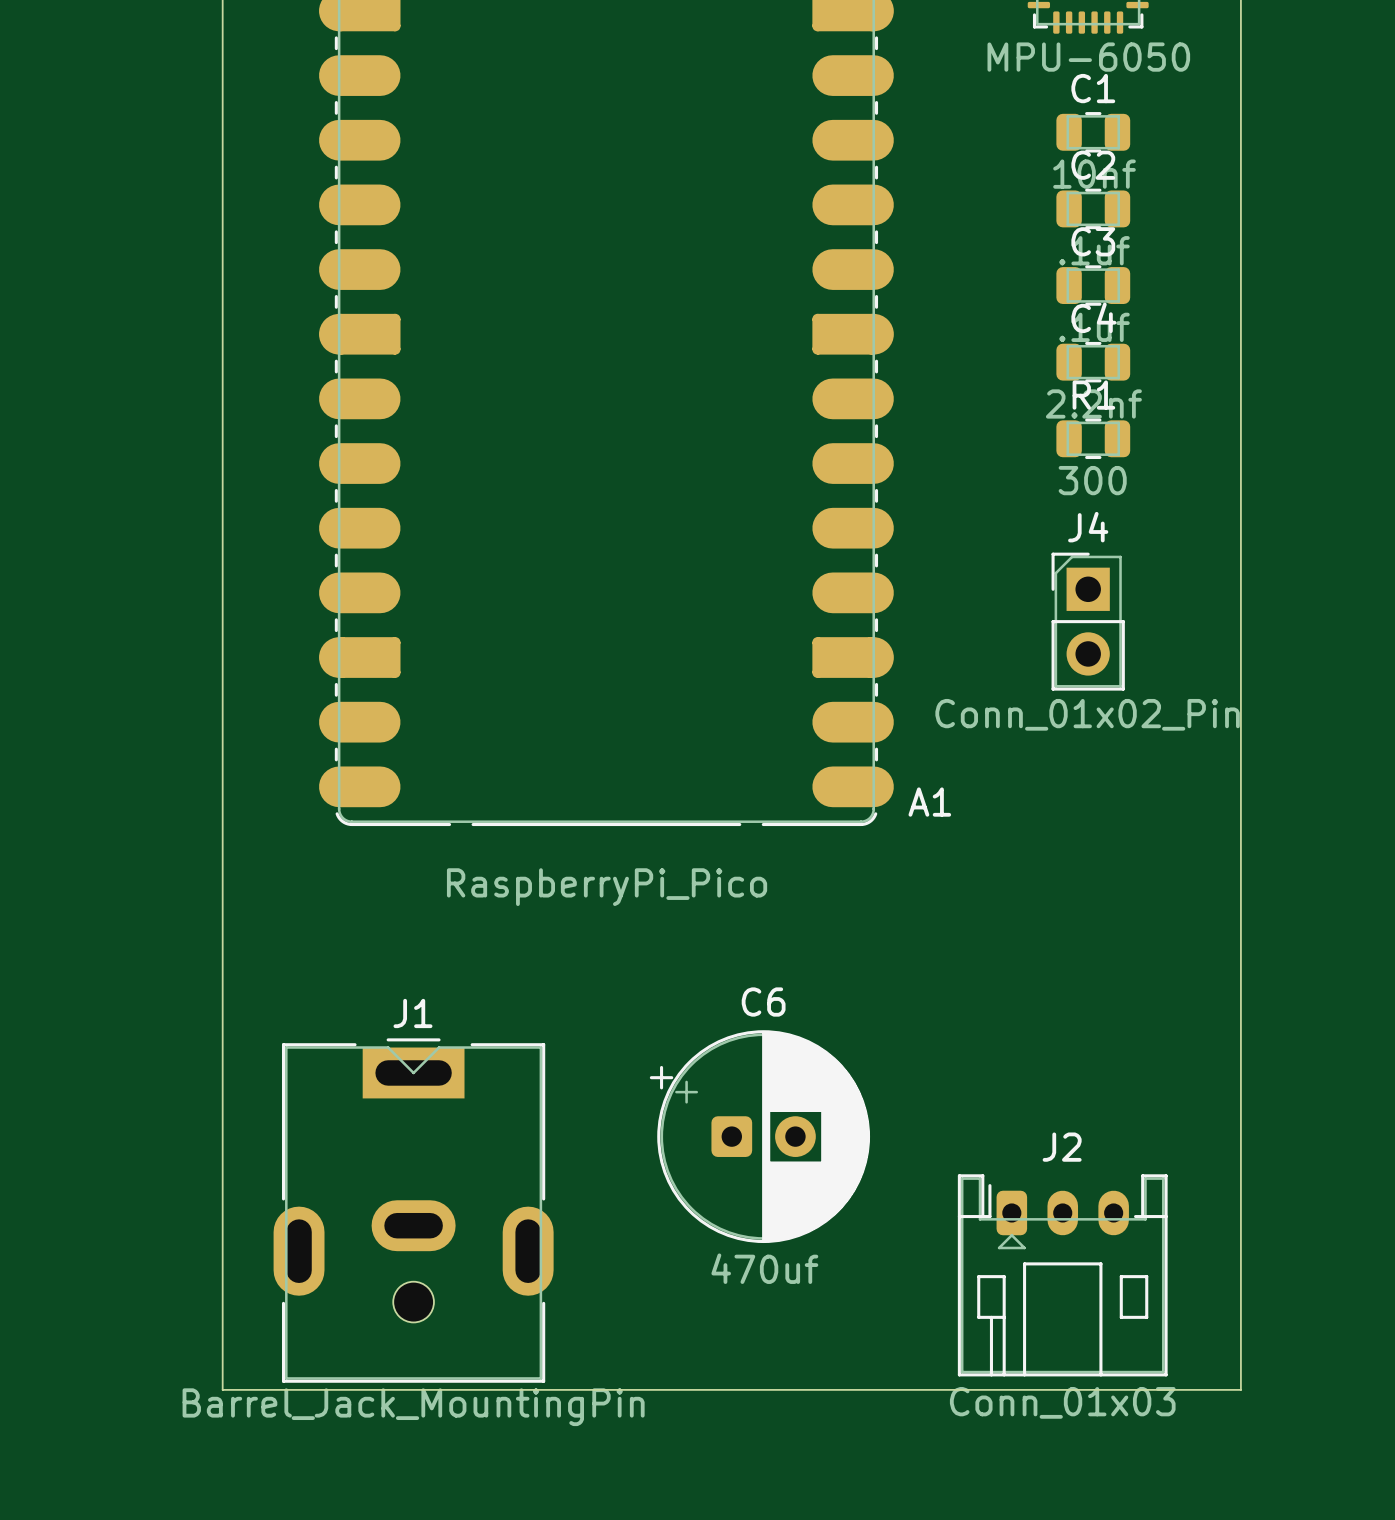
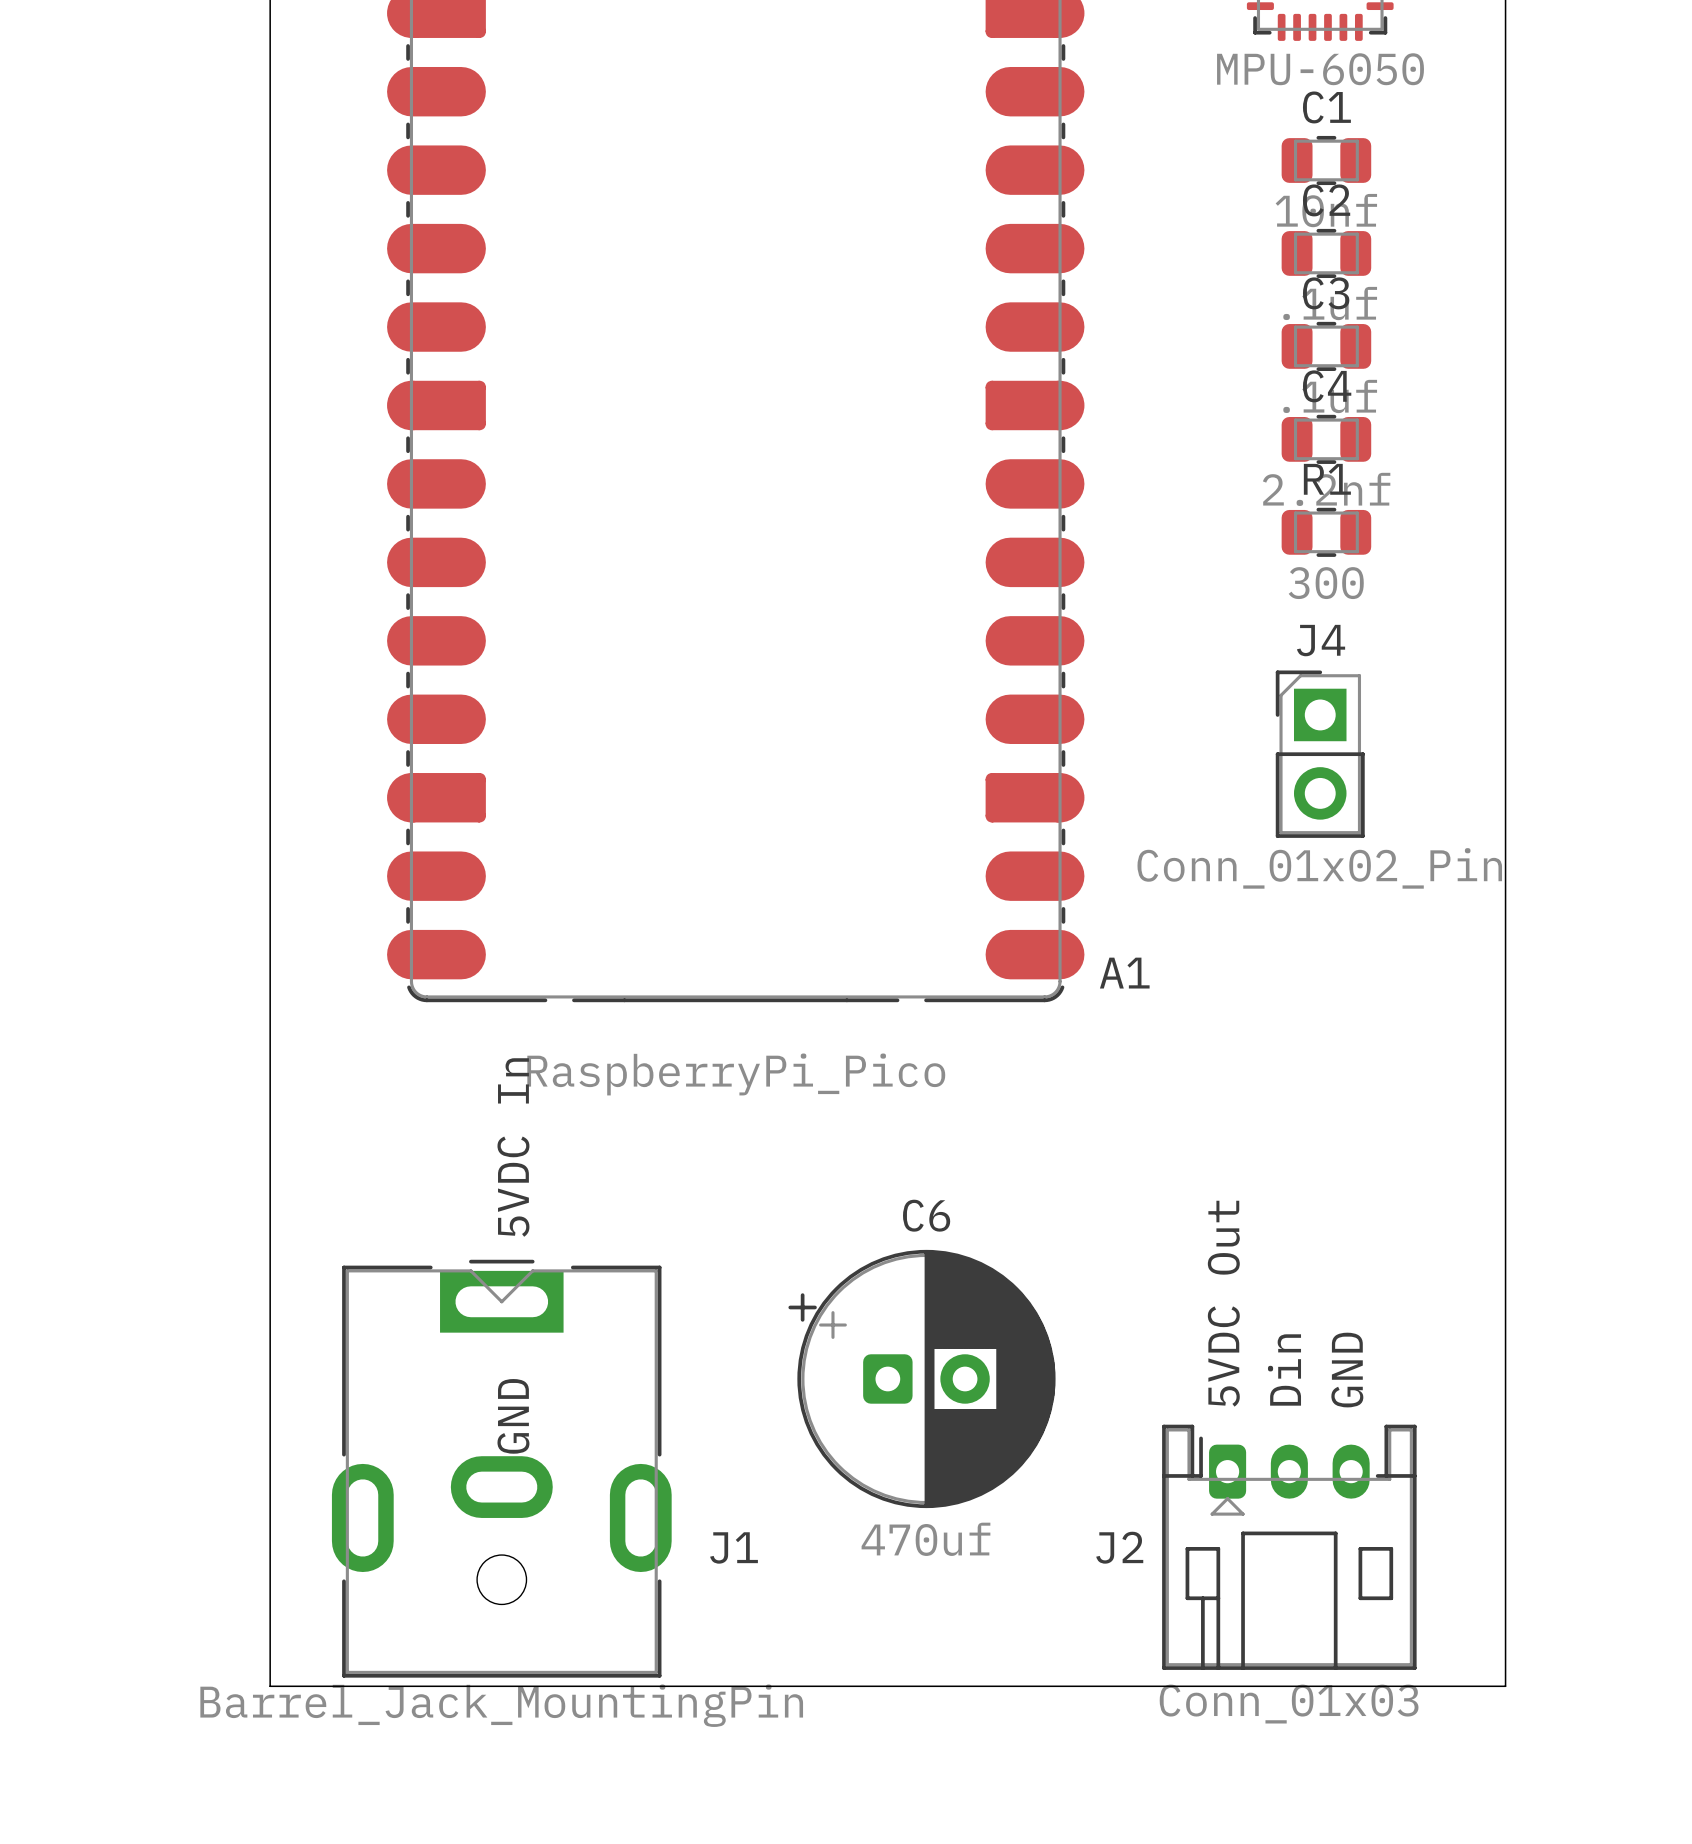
text: none -> 5VDC In (513, 1147)
J1 name position: J1 (412, 1013) -> J1 (734, 1547)
text: none -> 5VDC Out (1223, 1303)
text: none -> GND (1347, 1370)
text: none -> Din (1284, 1369)
J2 name position: J2 (1062, 1147) -> J2 (1119, 1547)
text: none -> GND (513, 1416)

